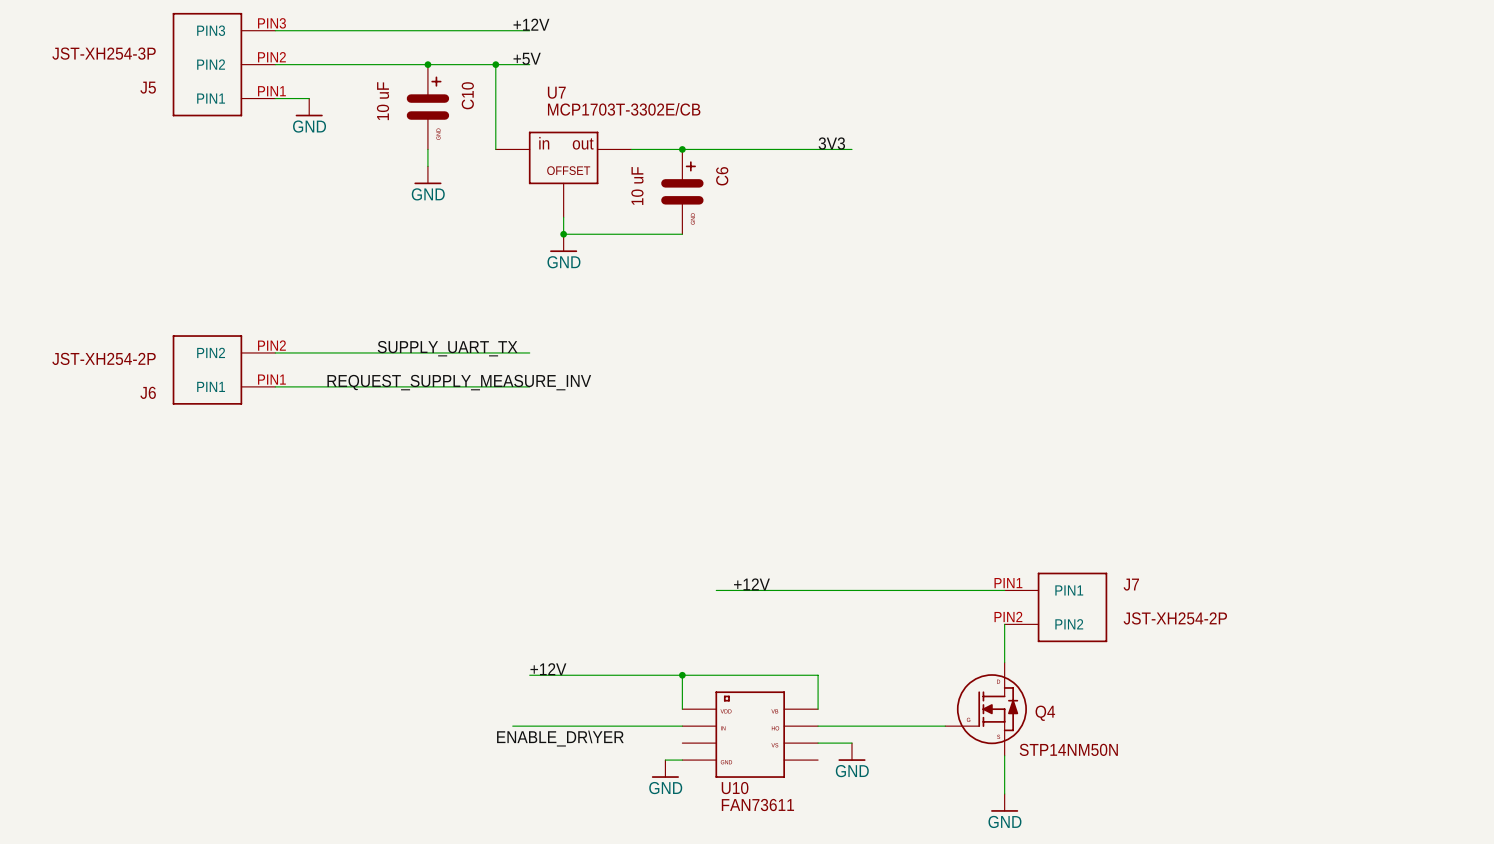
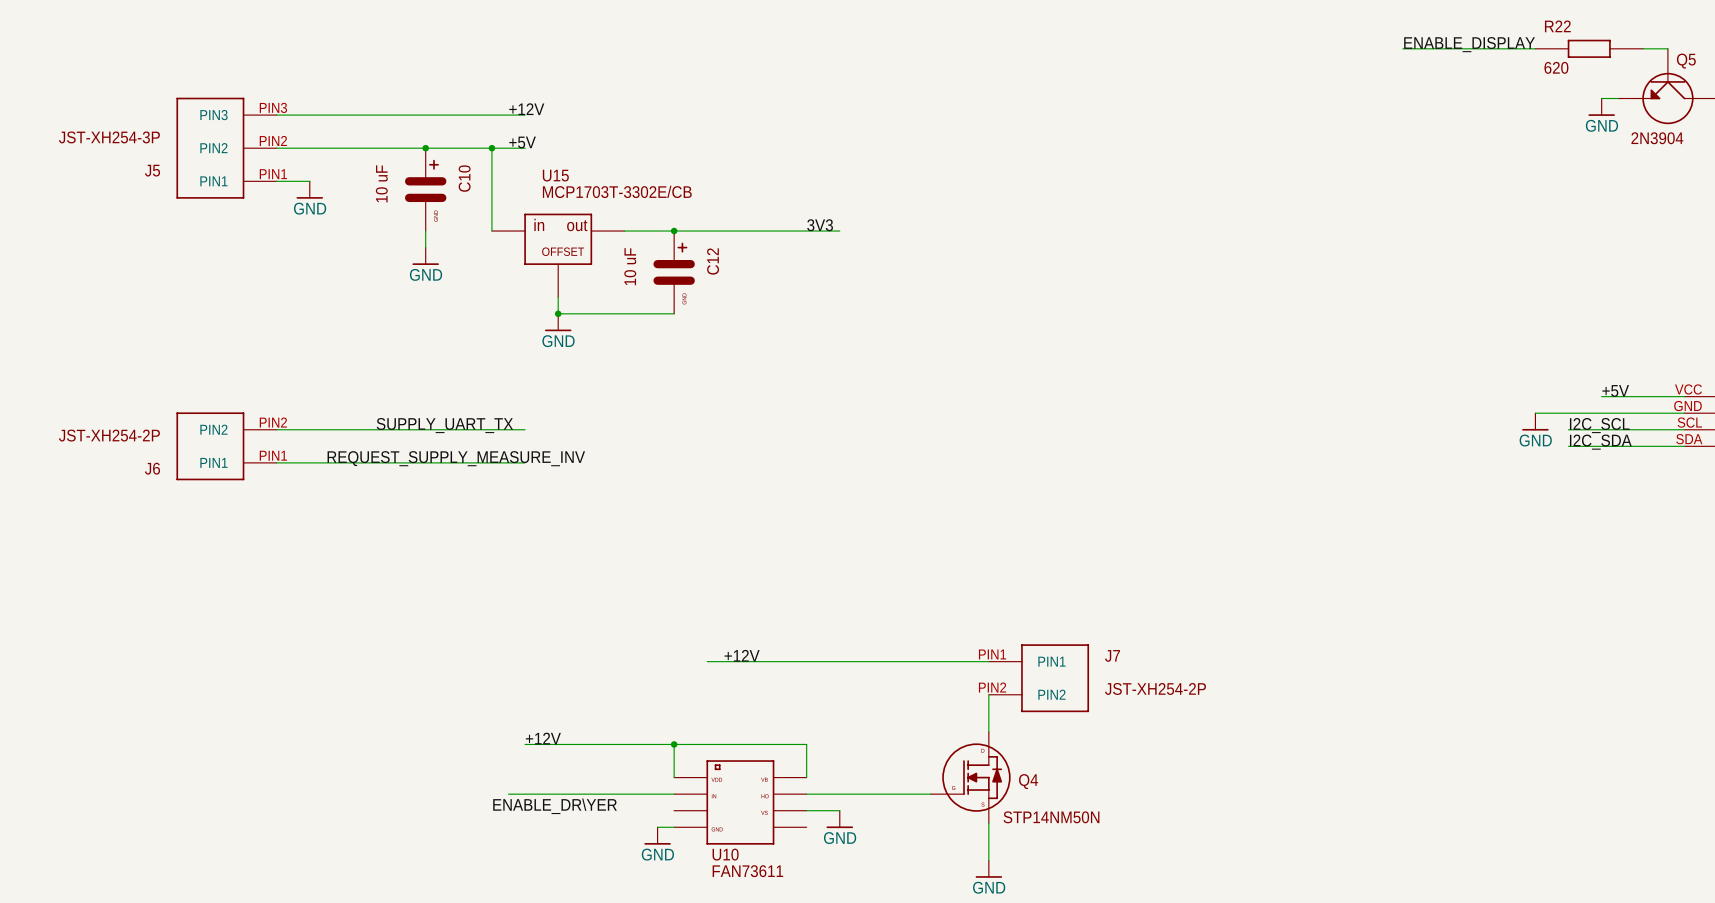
U7 name: U7 (556, 92) -> U15 (555, 175)
C6 name: C6 (722, 176) -> C12 (713, 261)

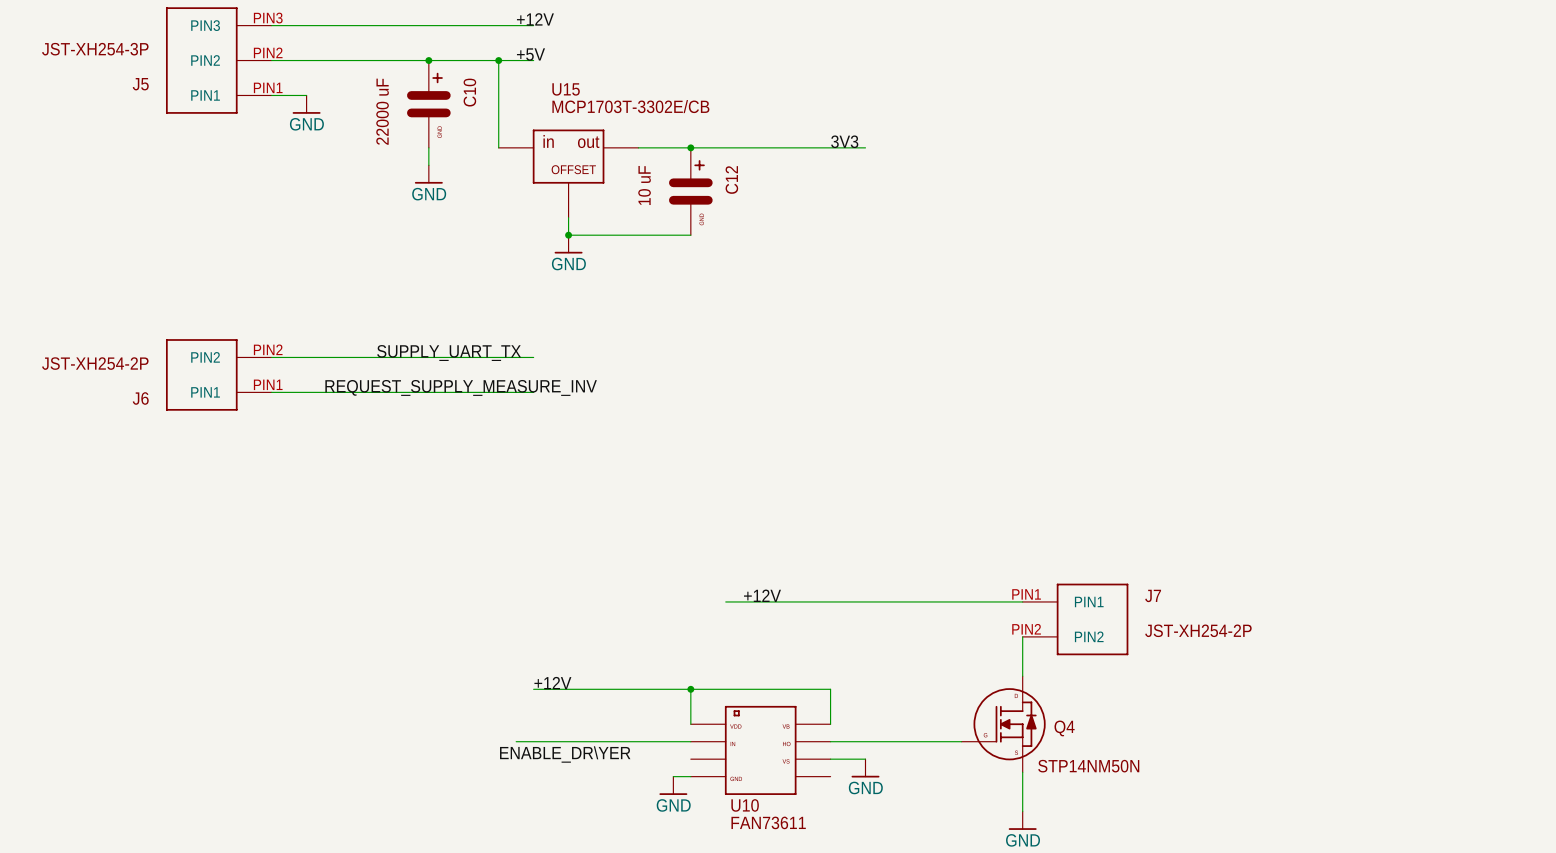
C10 value: 10 uF (381, 183) -> 22000 uF (382, 111)

